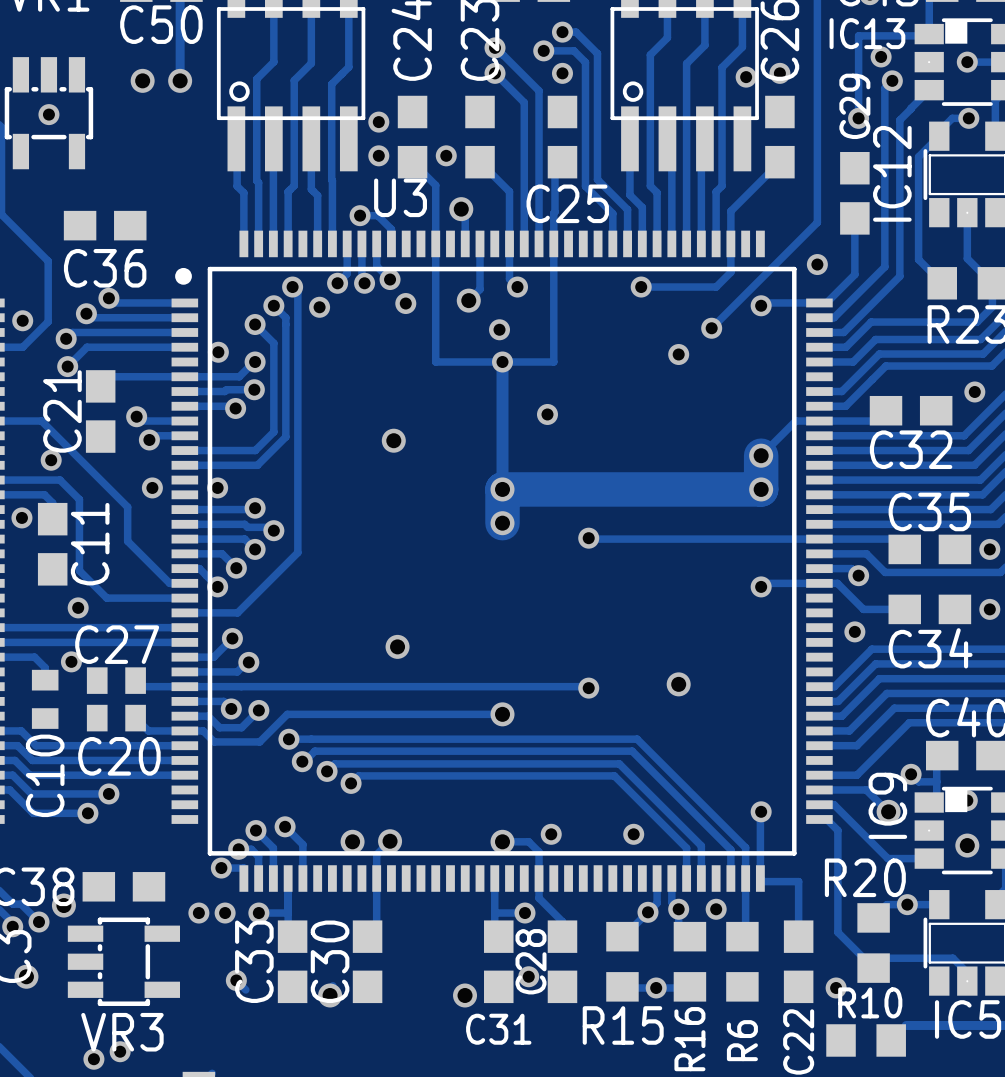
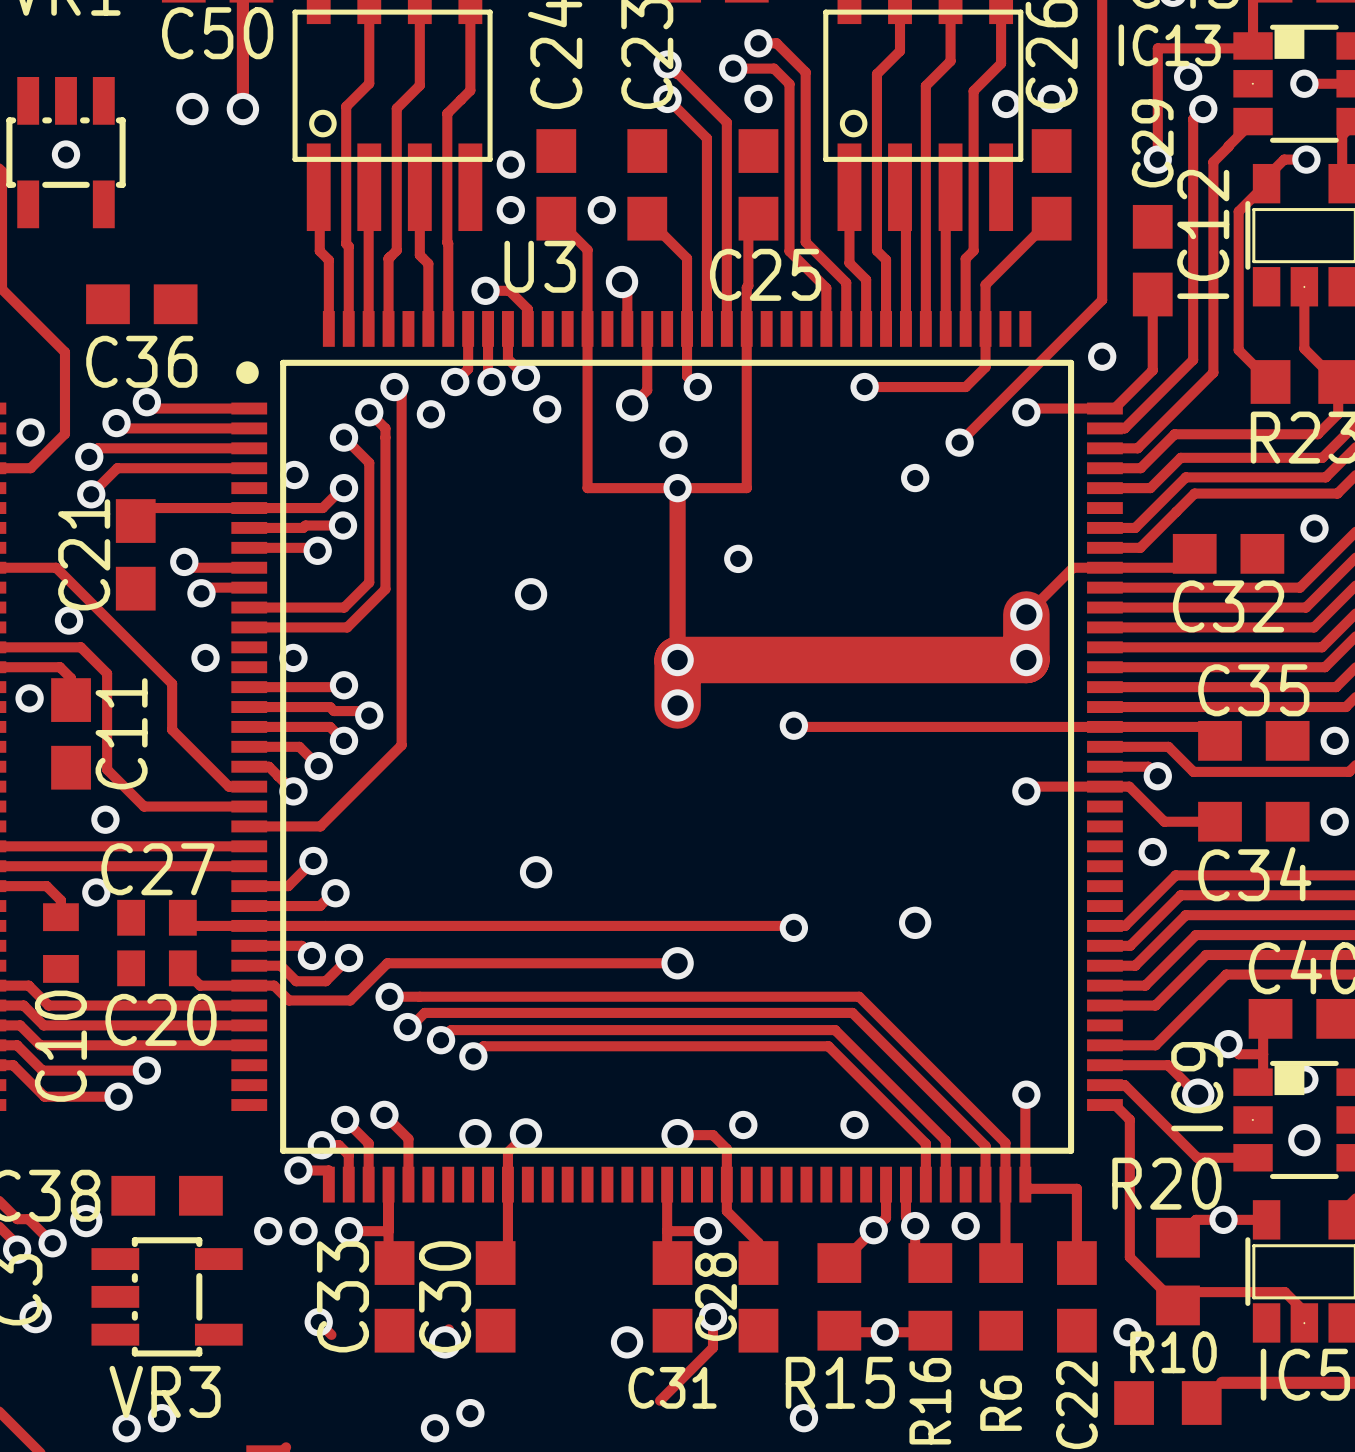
track: none -> (712, 1317) (712, 1347) (660, 1400)
via: none -> (470, 1413)
via: none -> (803, 1418)
via: none -> (434, 1428)

